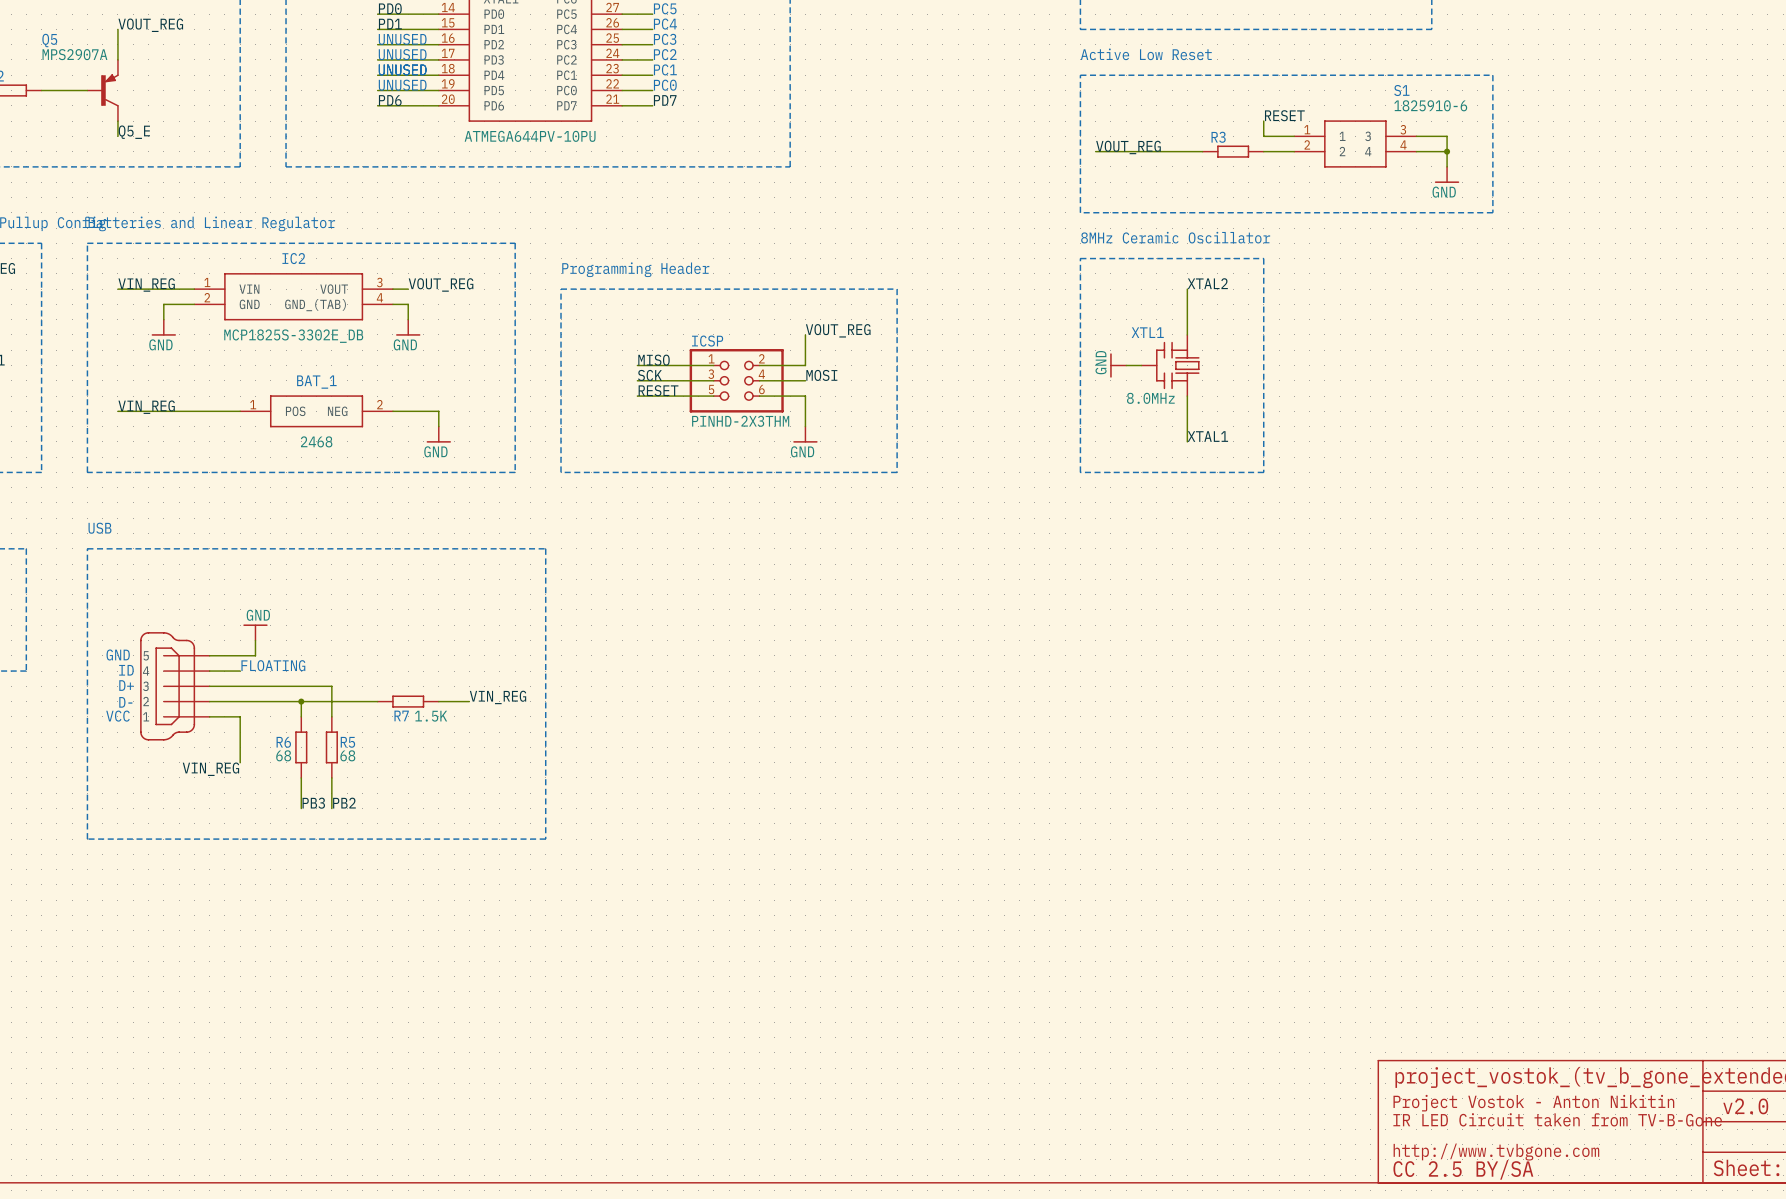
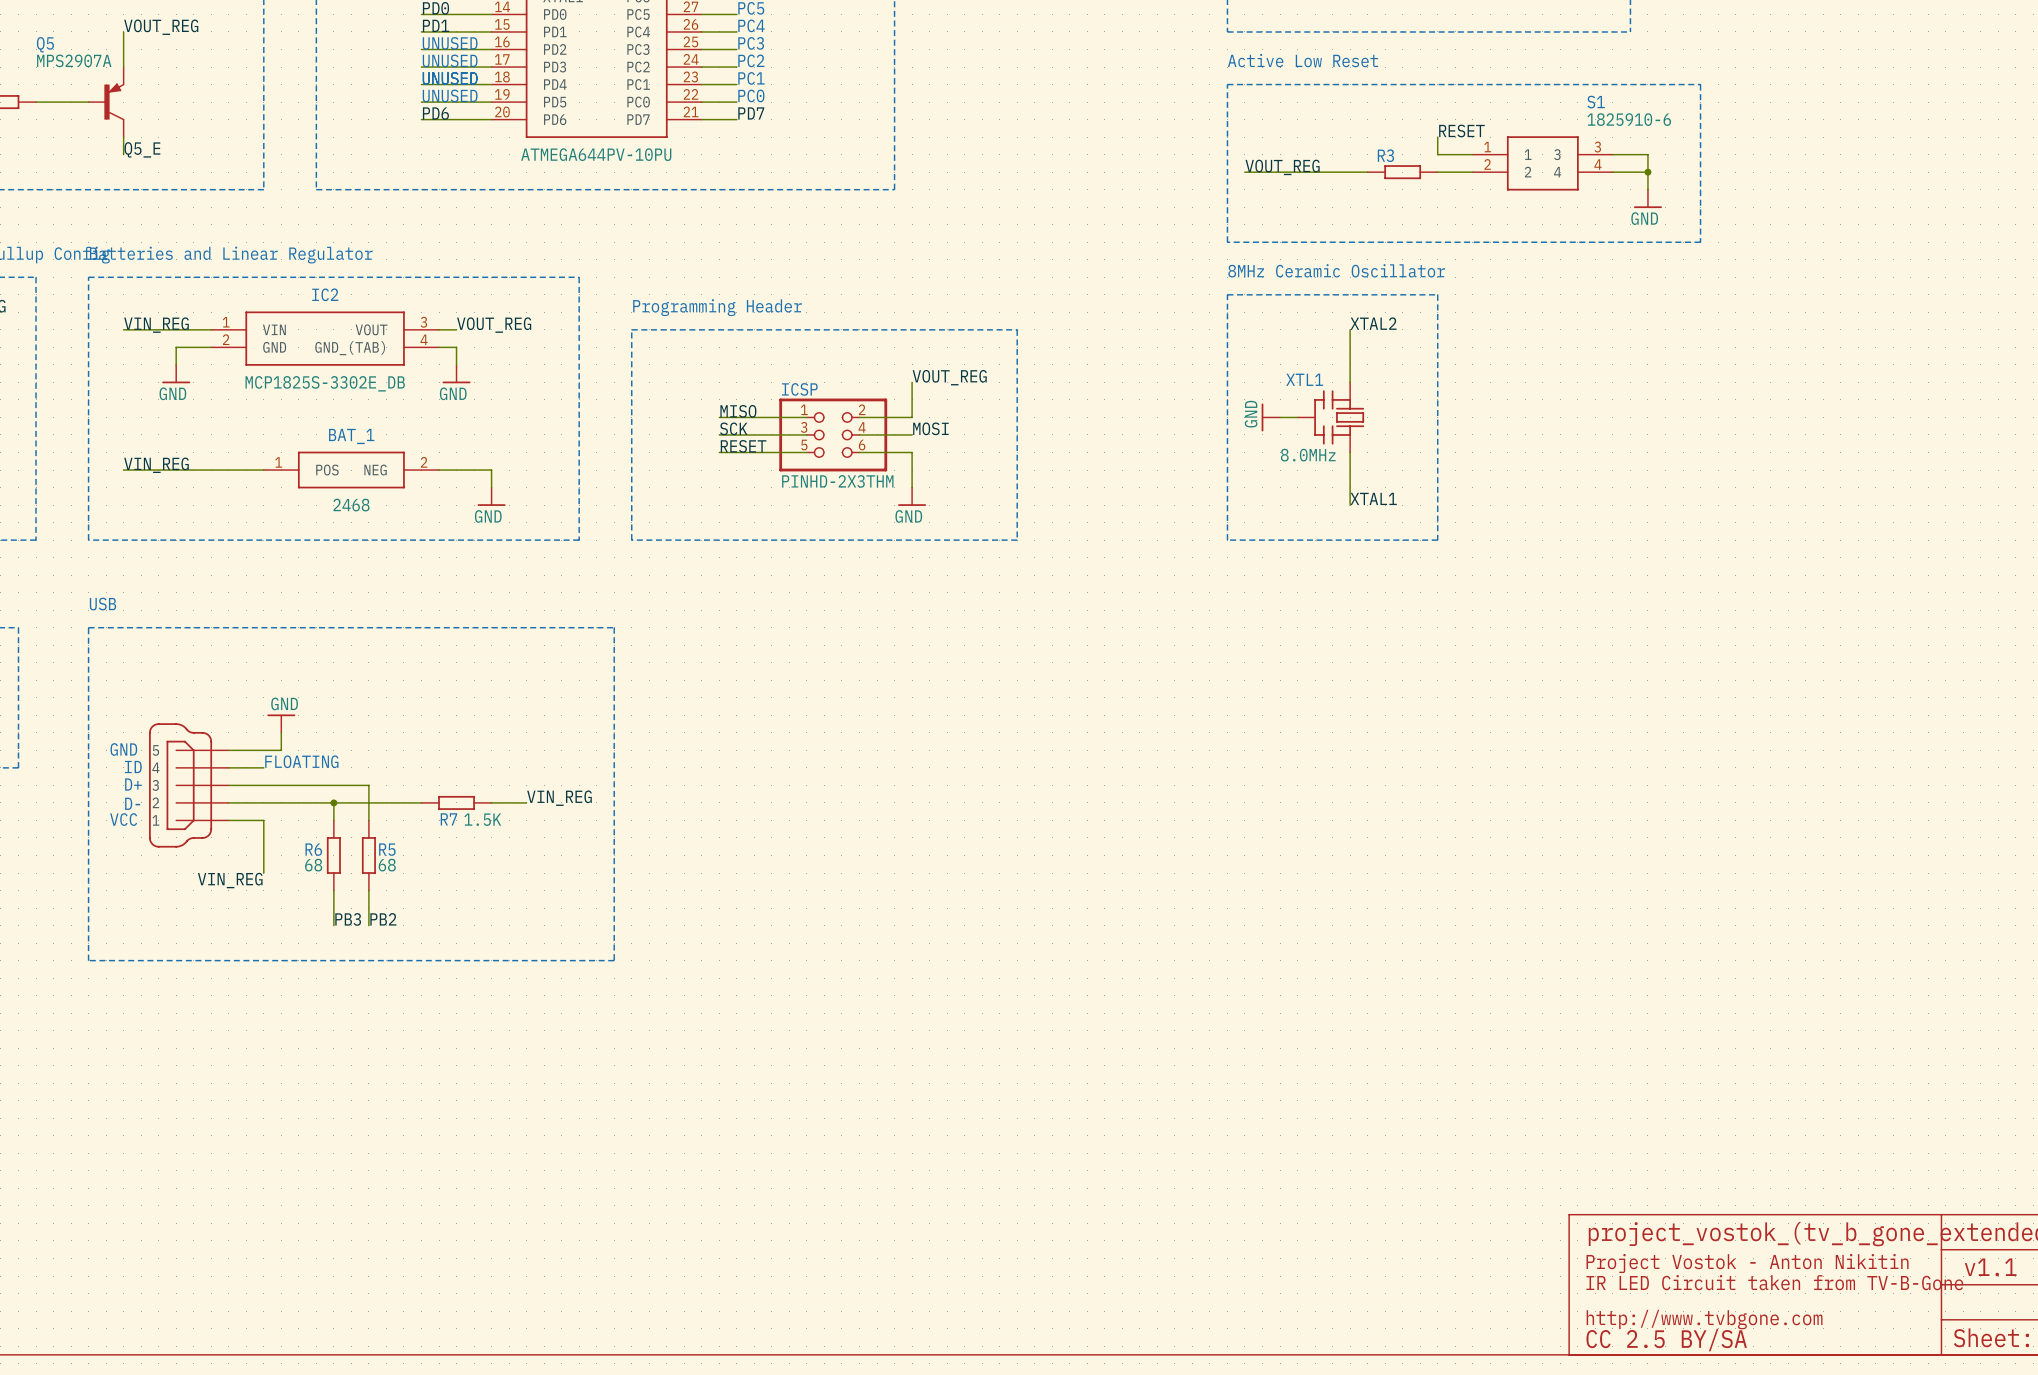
text: v2.0 (1745, 1106) -> v1.1 (1990, 1267)

